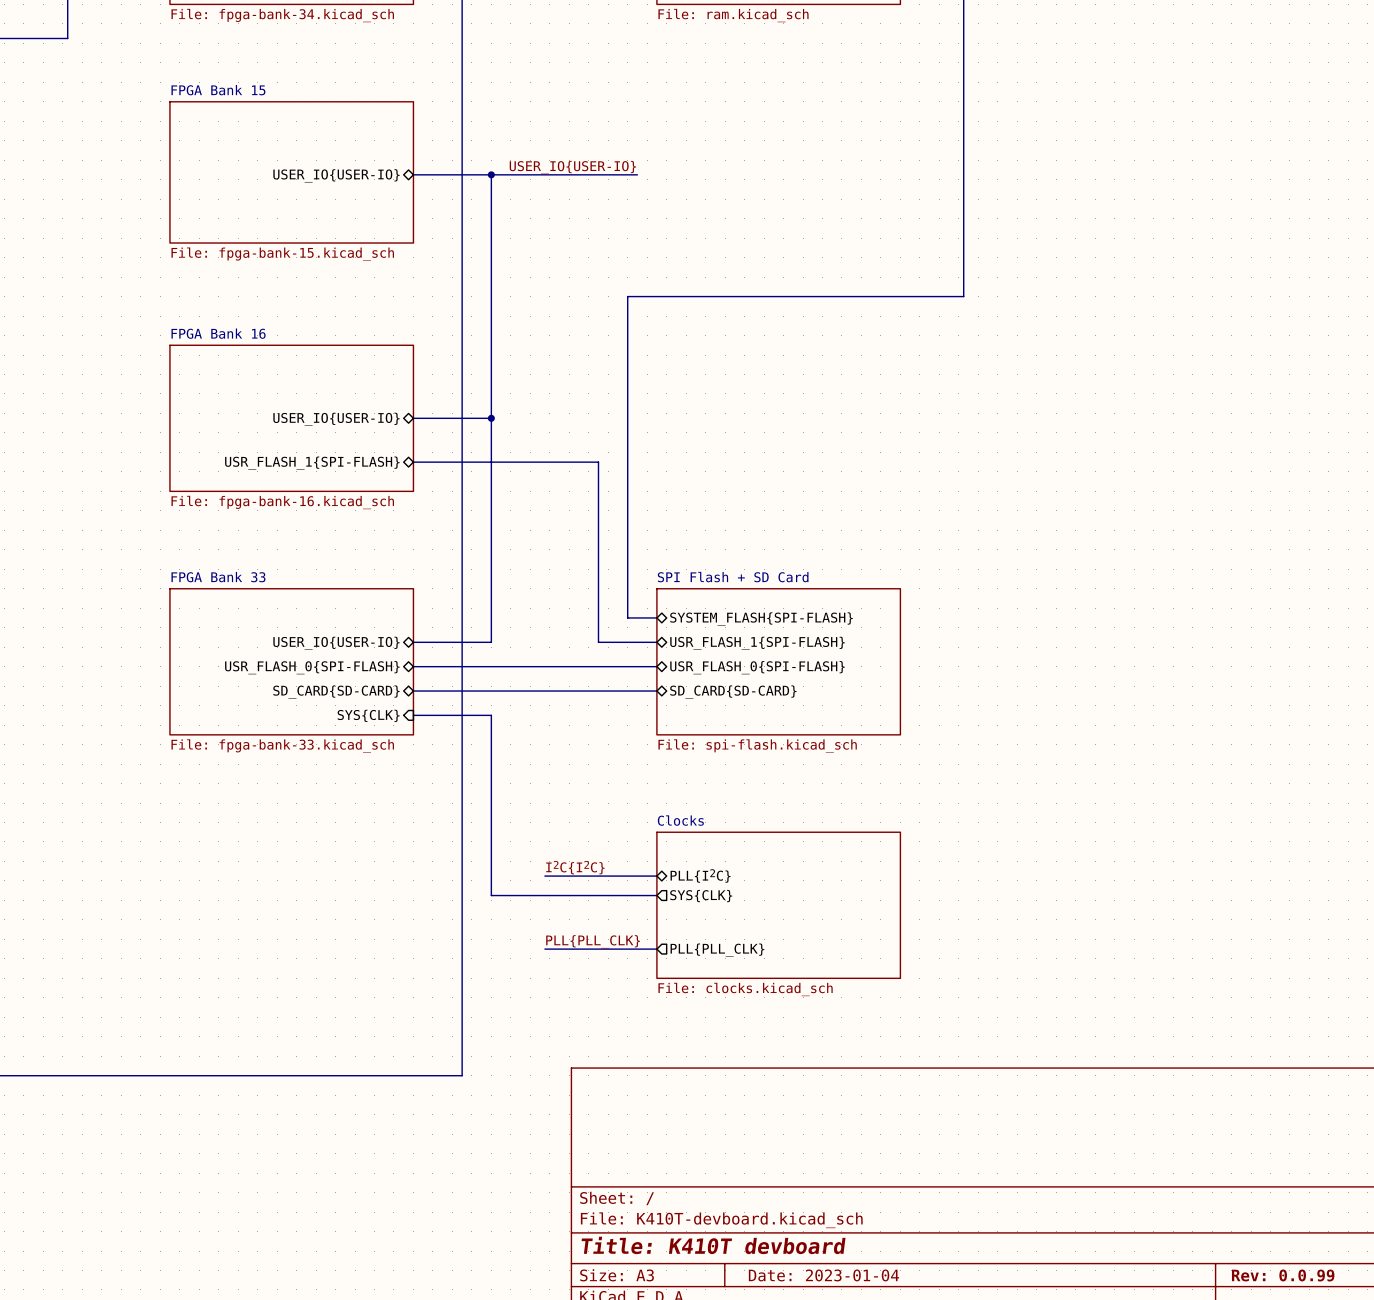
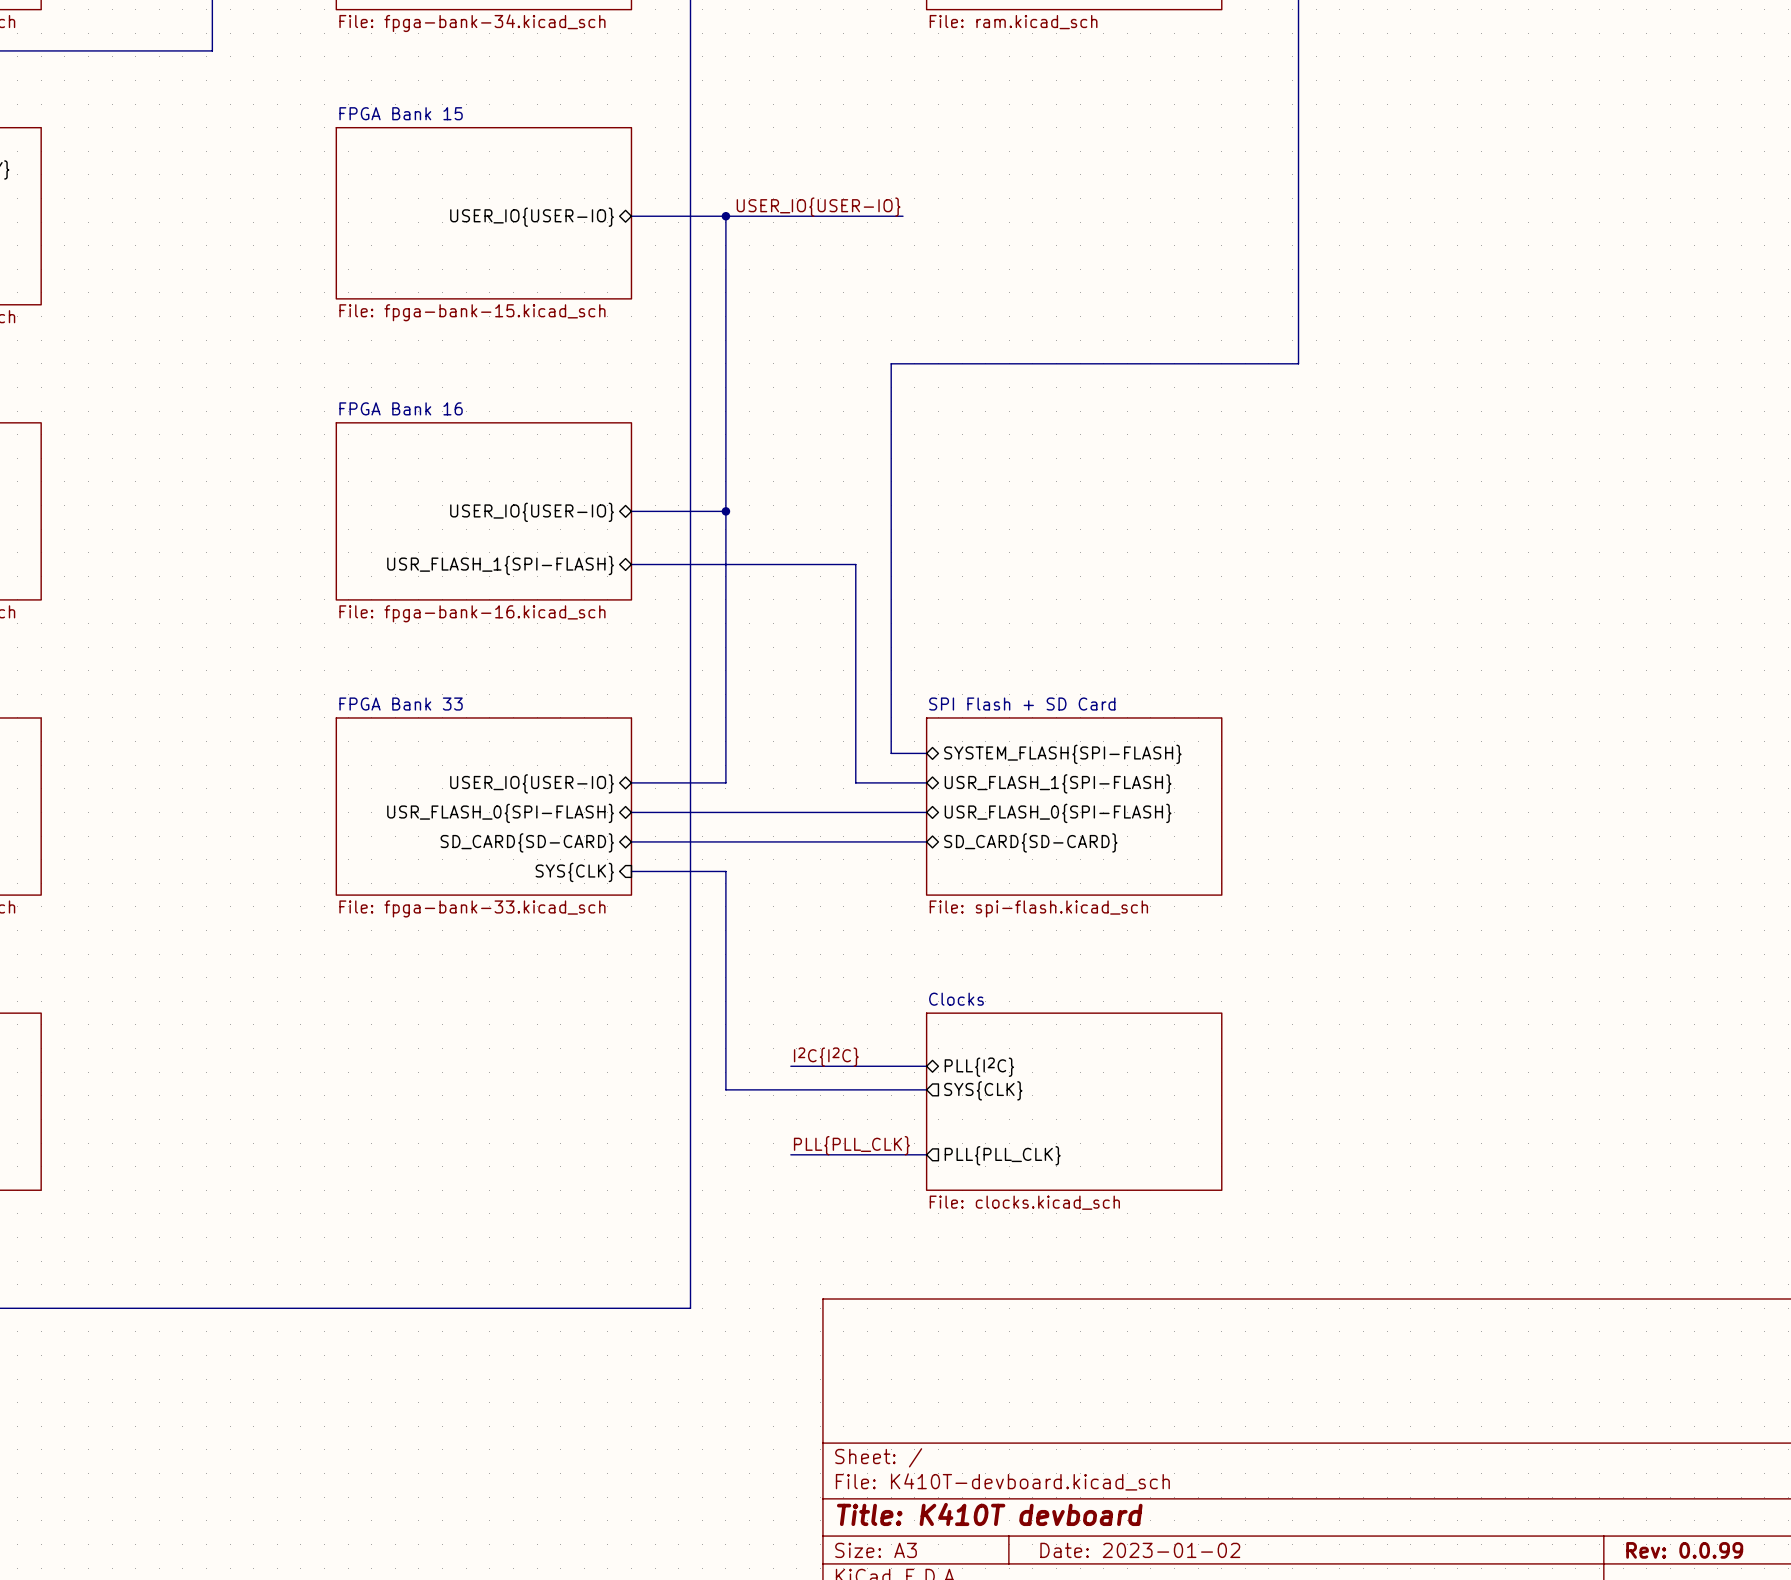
title block: Date: 2023-01-04 (823, 1275) -> Date: 2023-01-02 (1140, 1550)

